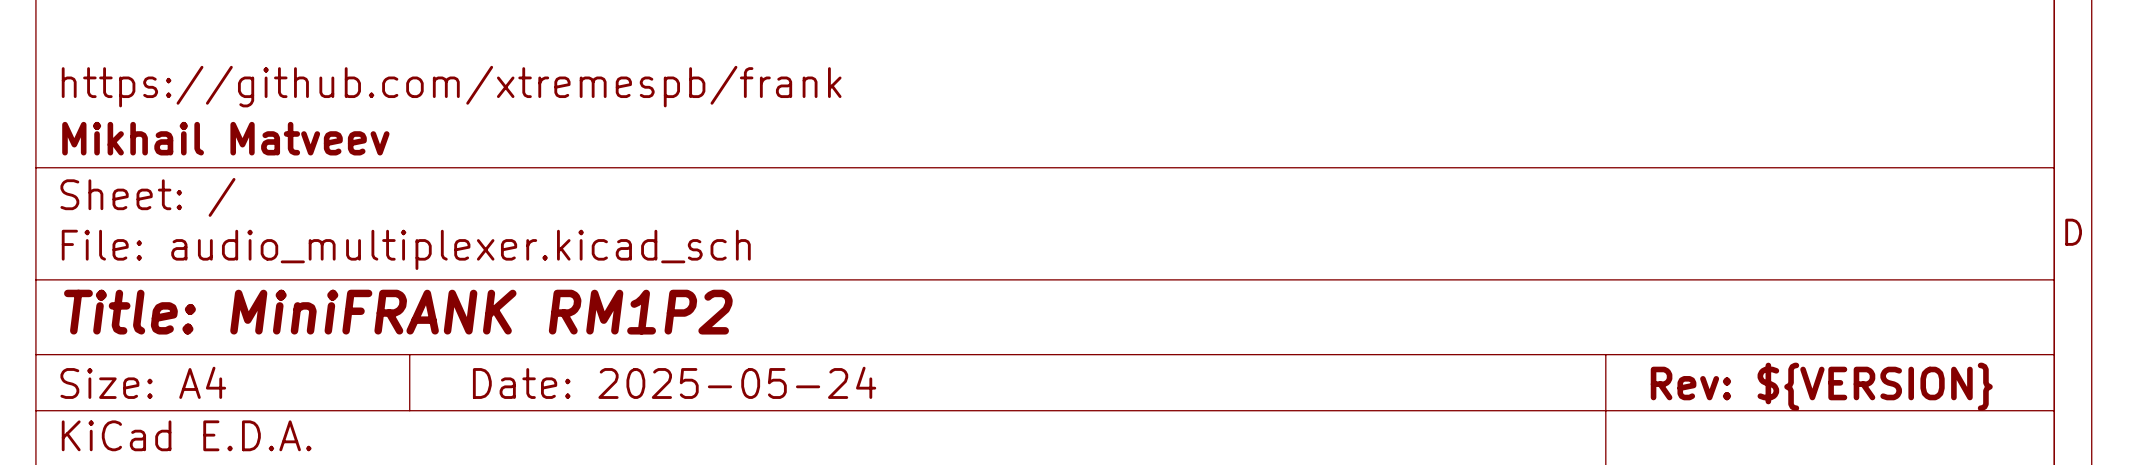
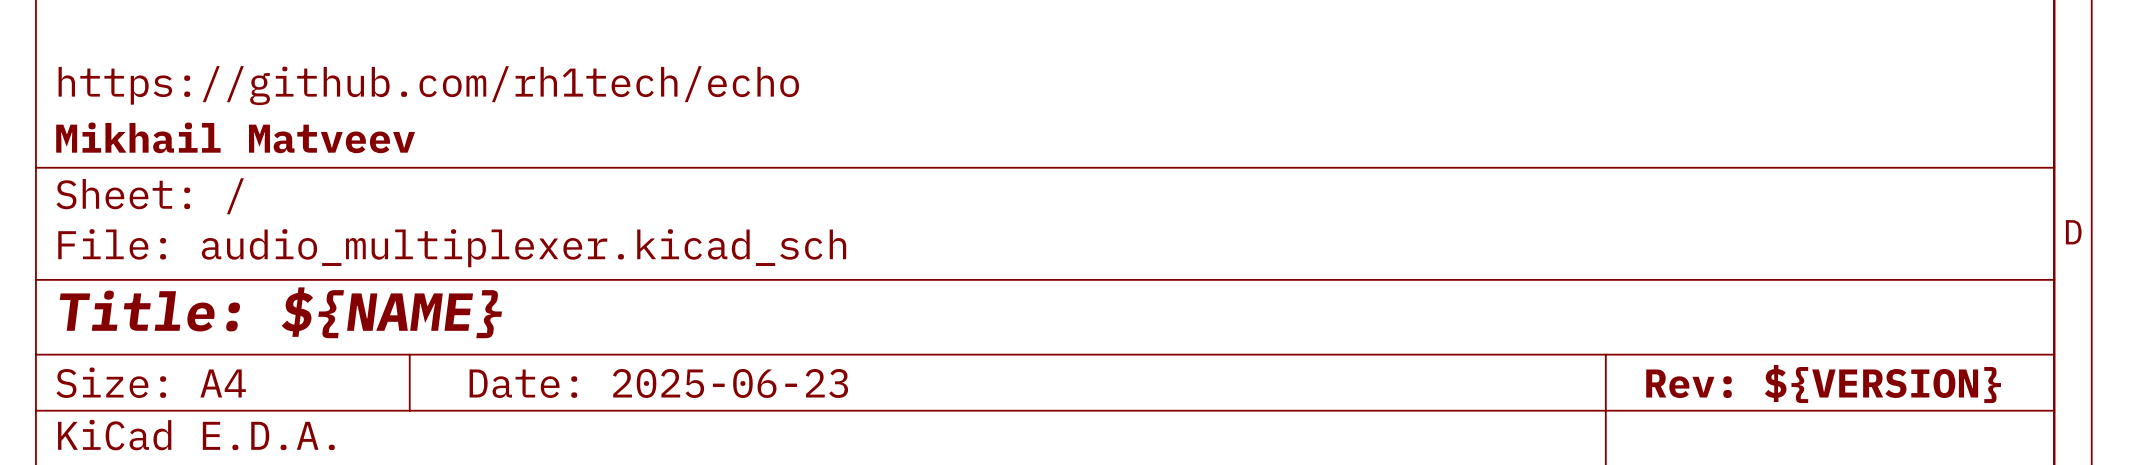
title block: https://github.com/xtremespb/frank (451, 86) -> https://github.com/rh1tech/echo (428, 85)
title block: Title: MiniFRANK RM1P2 (398, 312) -> Title: ${NAME} (280, 312)
title block: Date: 2025-05-24 (674, 382) -> Date: 2025-06-23 (658, 383)

